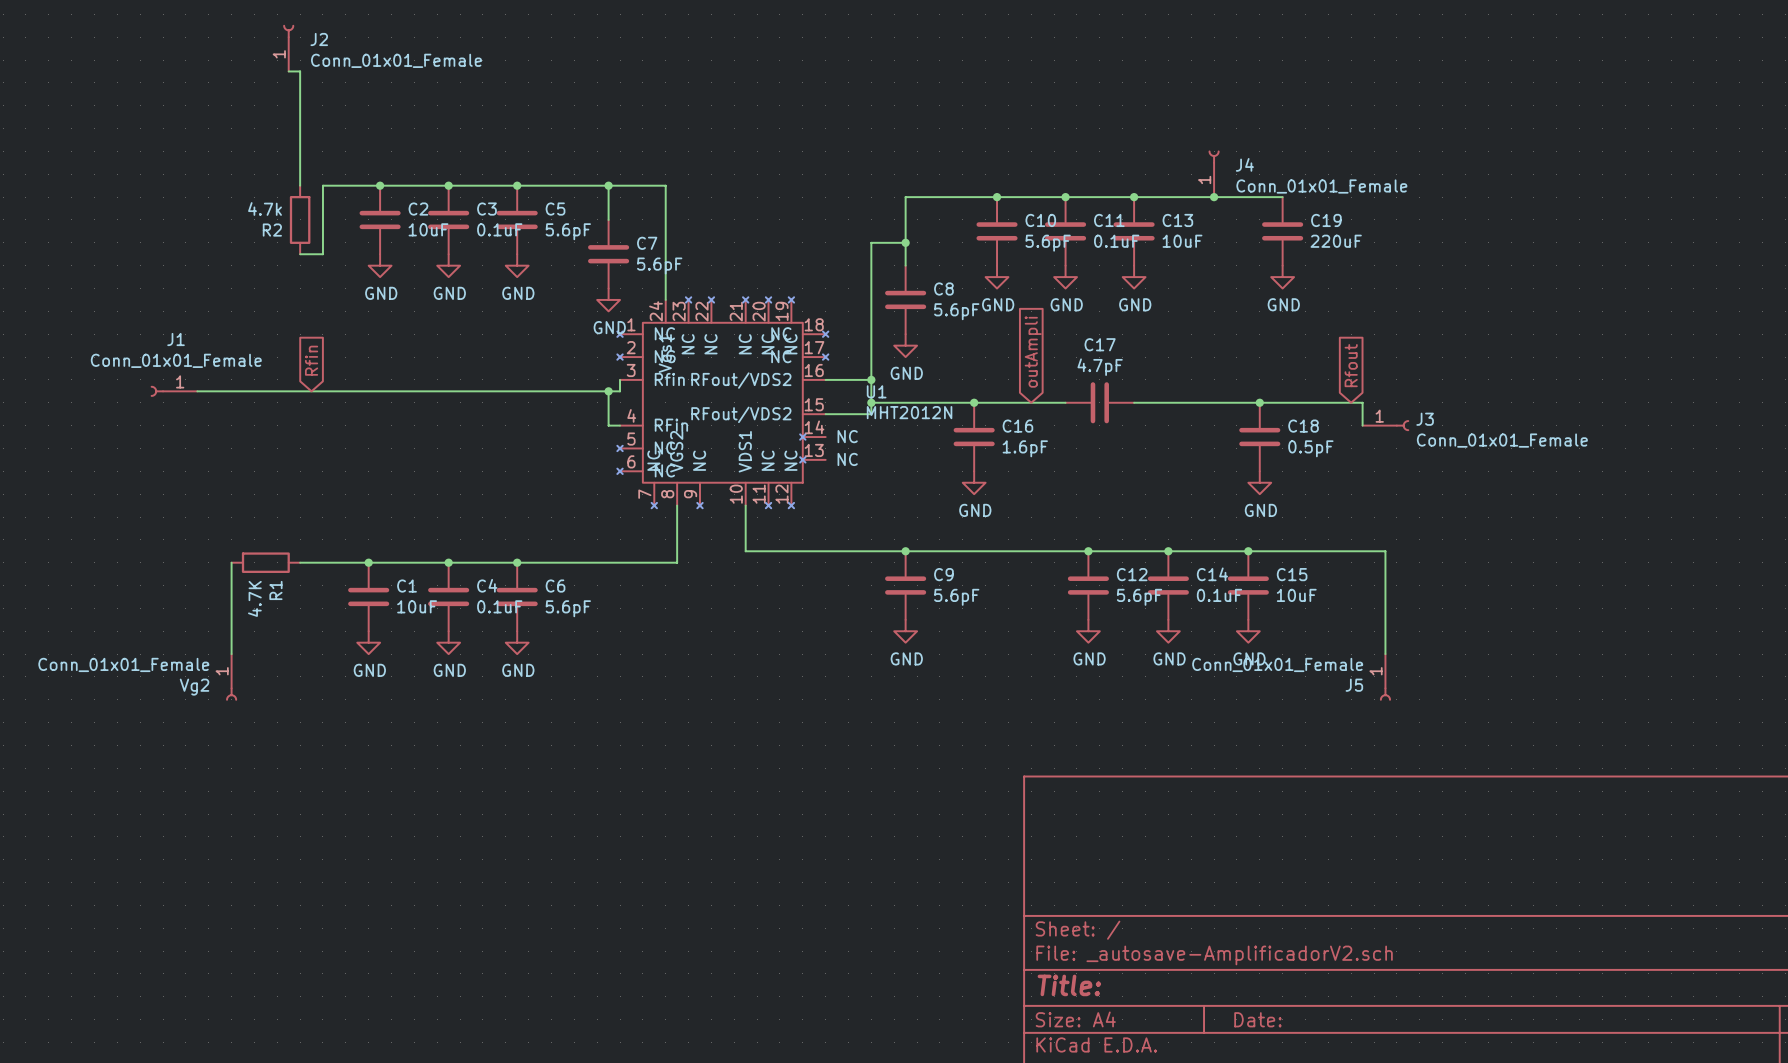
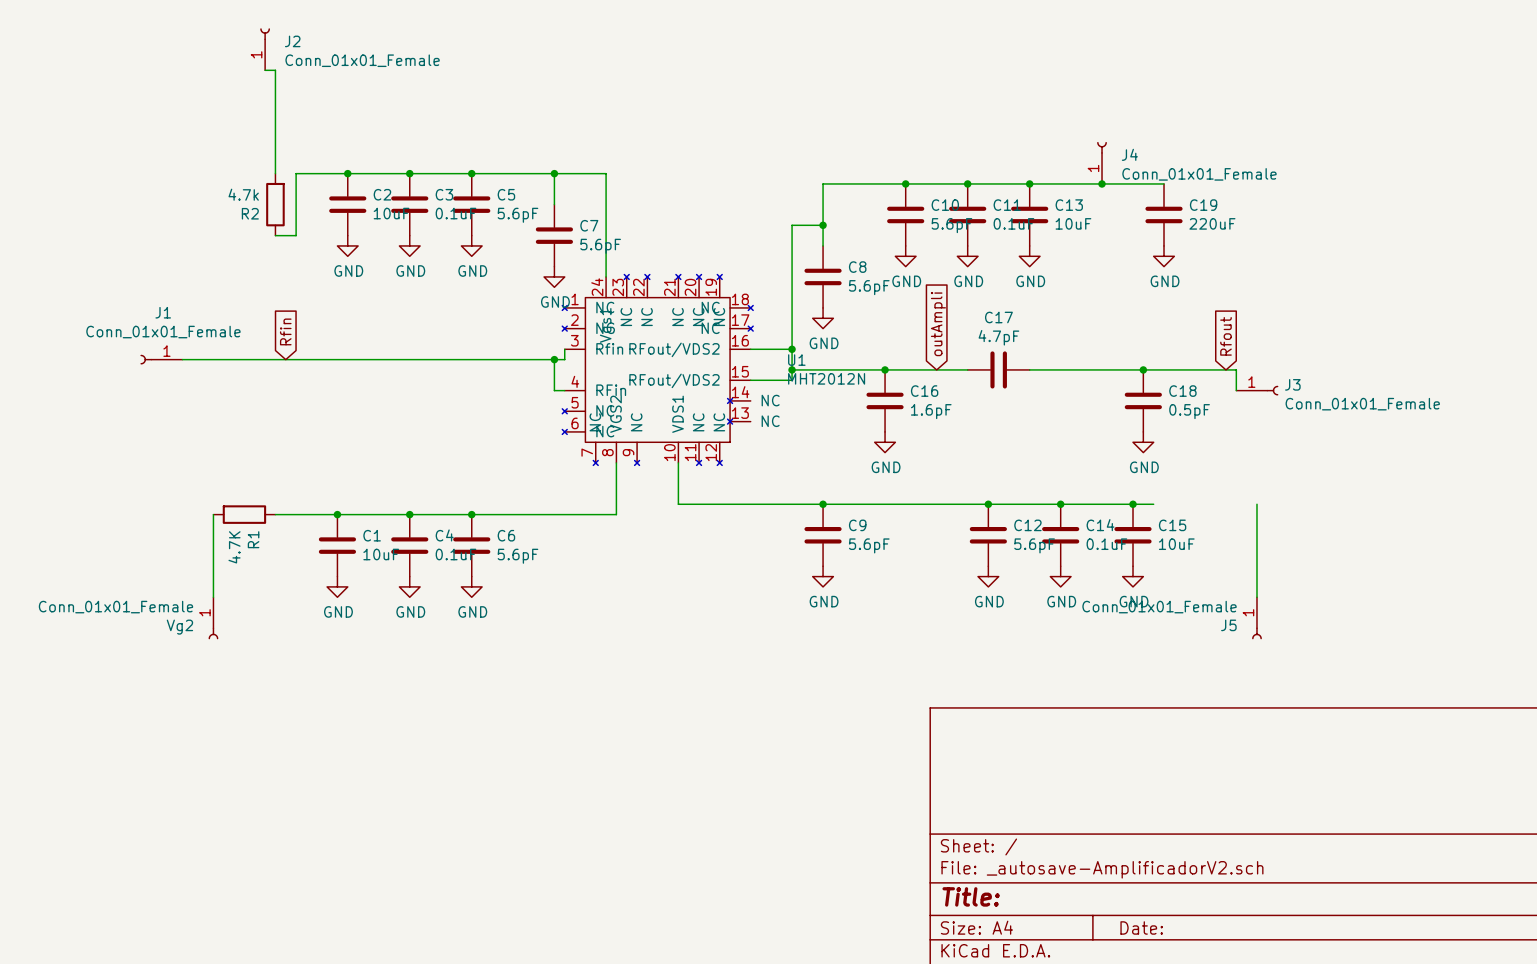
wire: (1271, 551) (1385, 551) -> none

